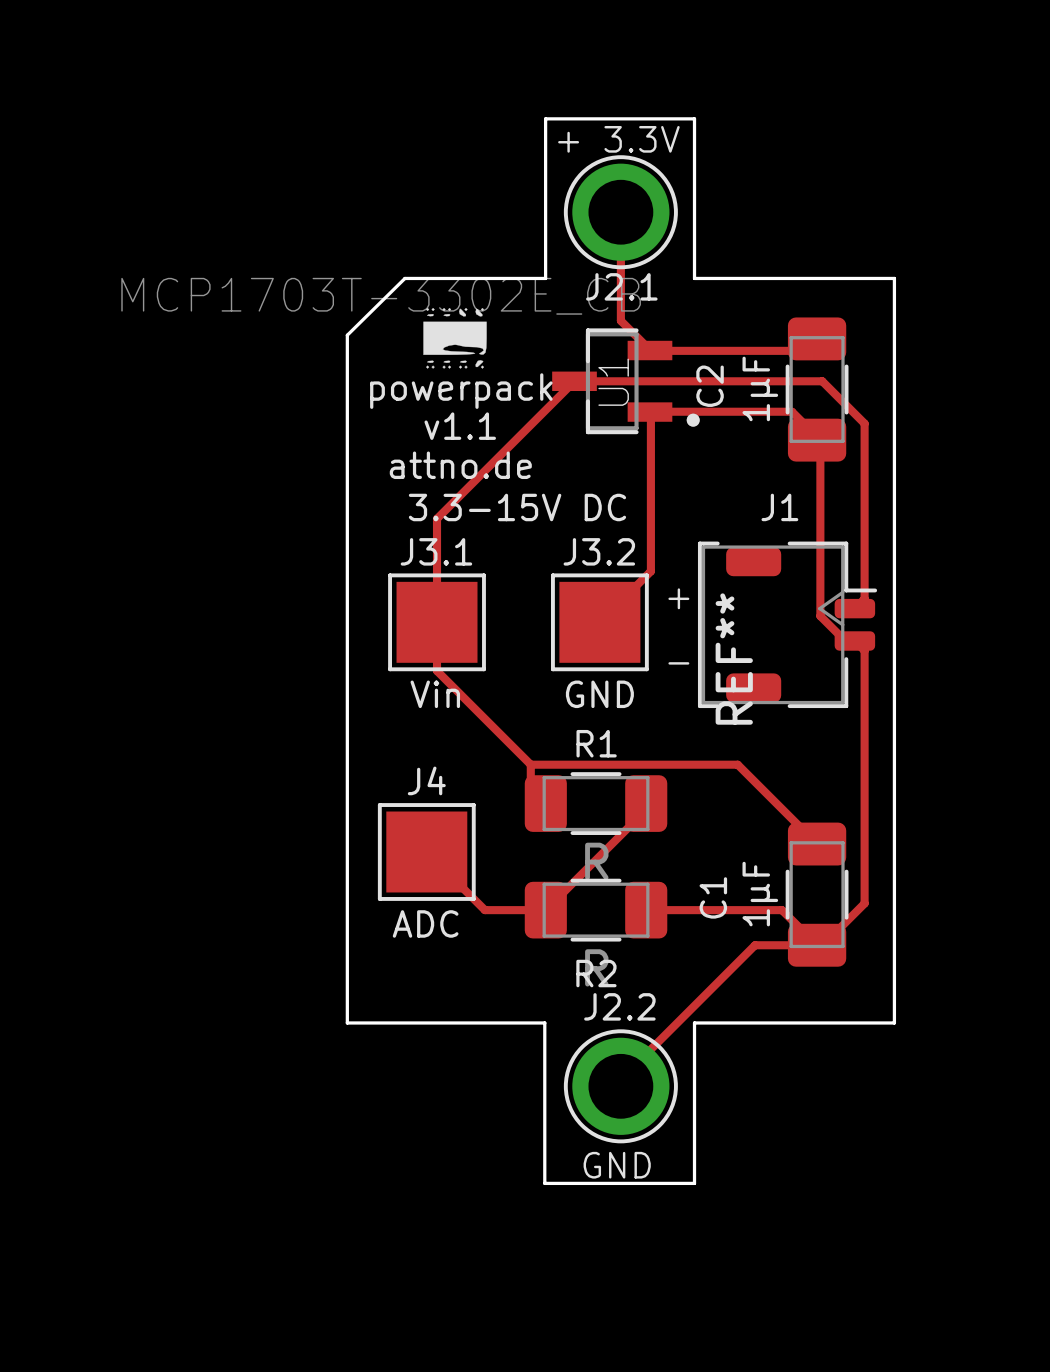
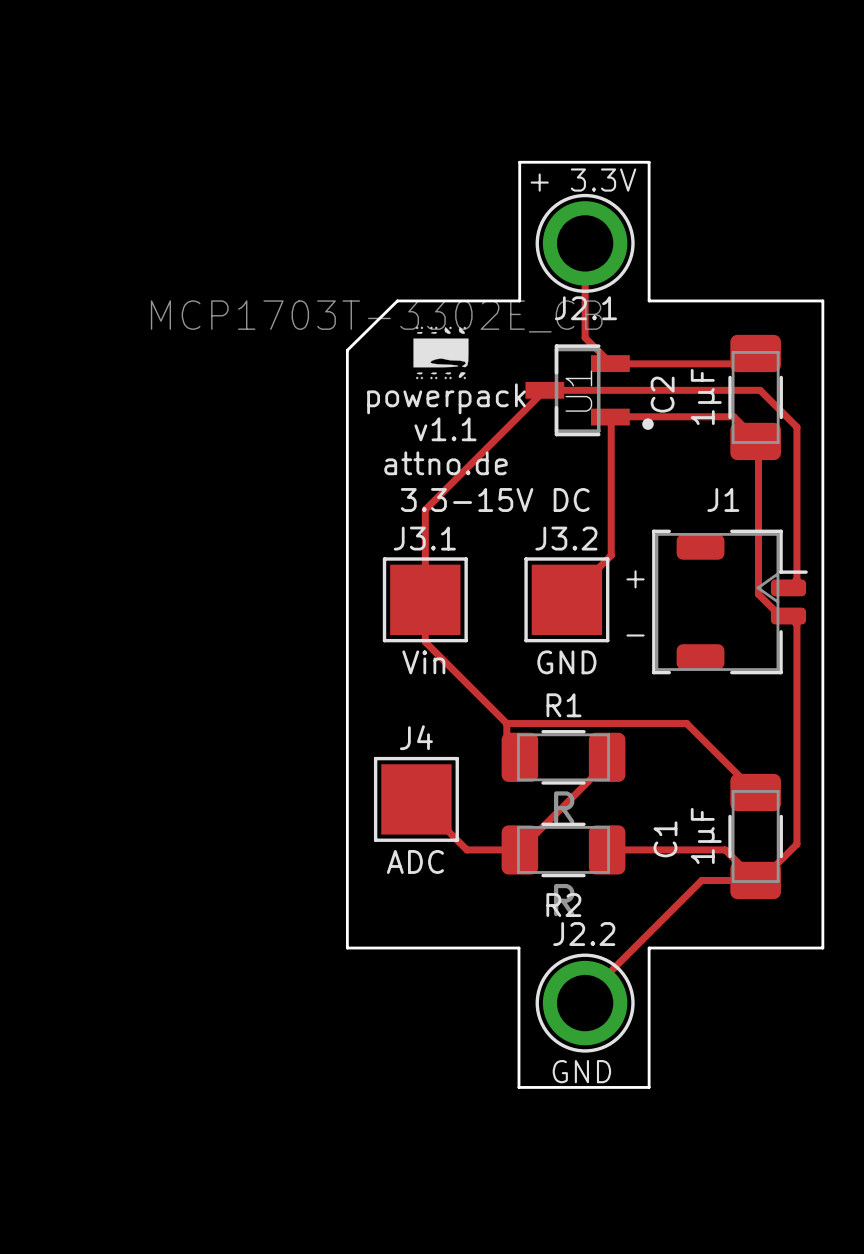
REF**: (734, 659) -> none

